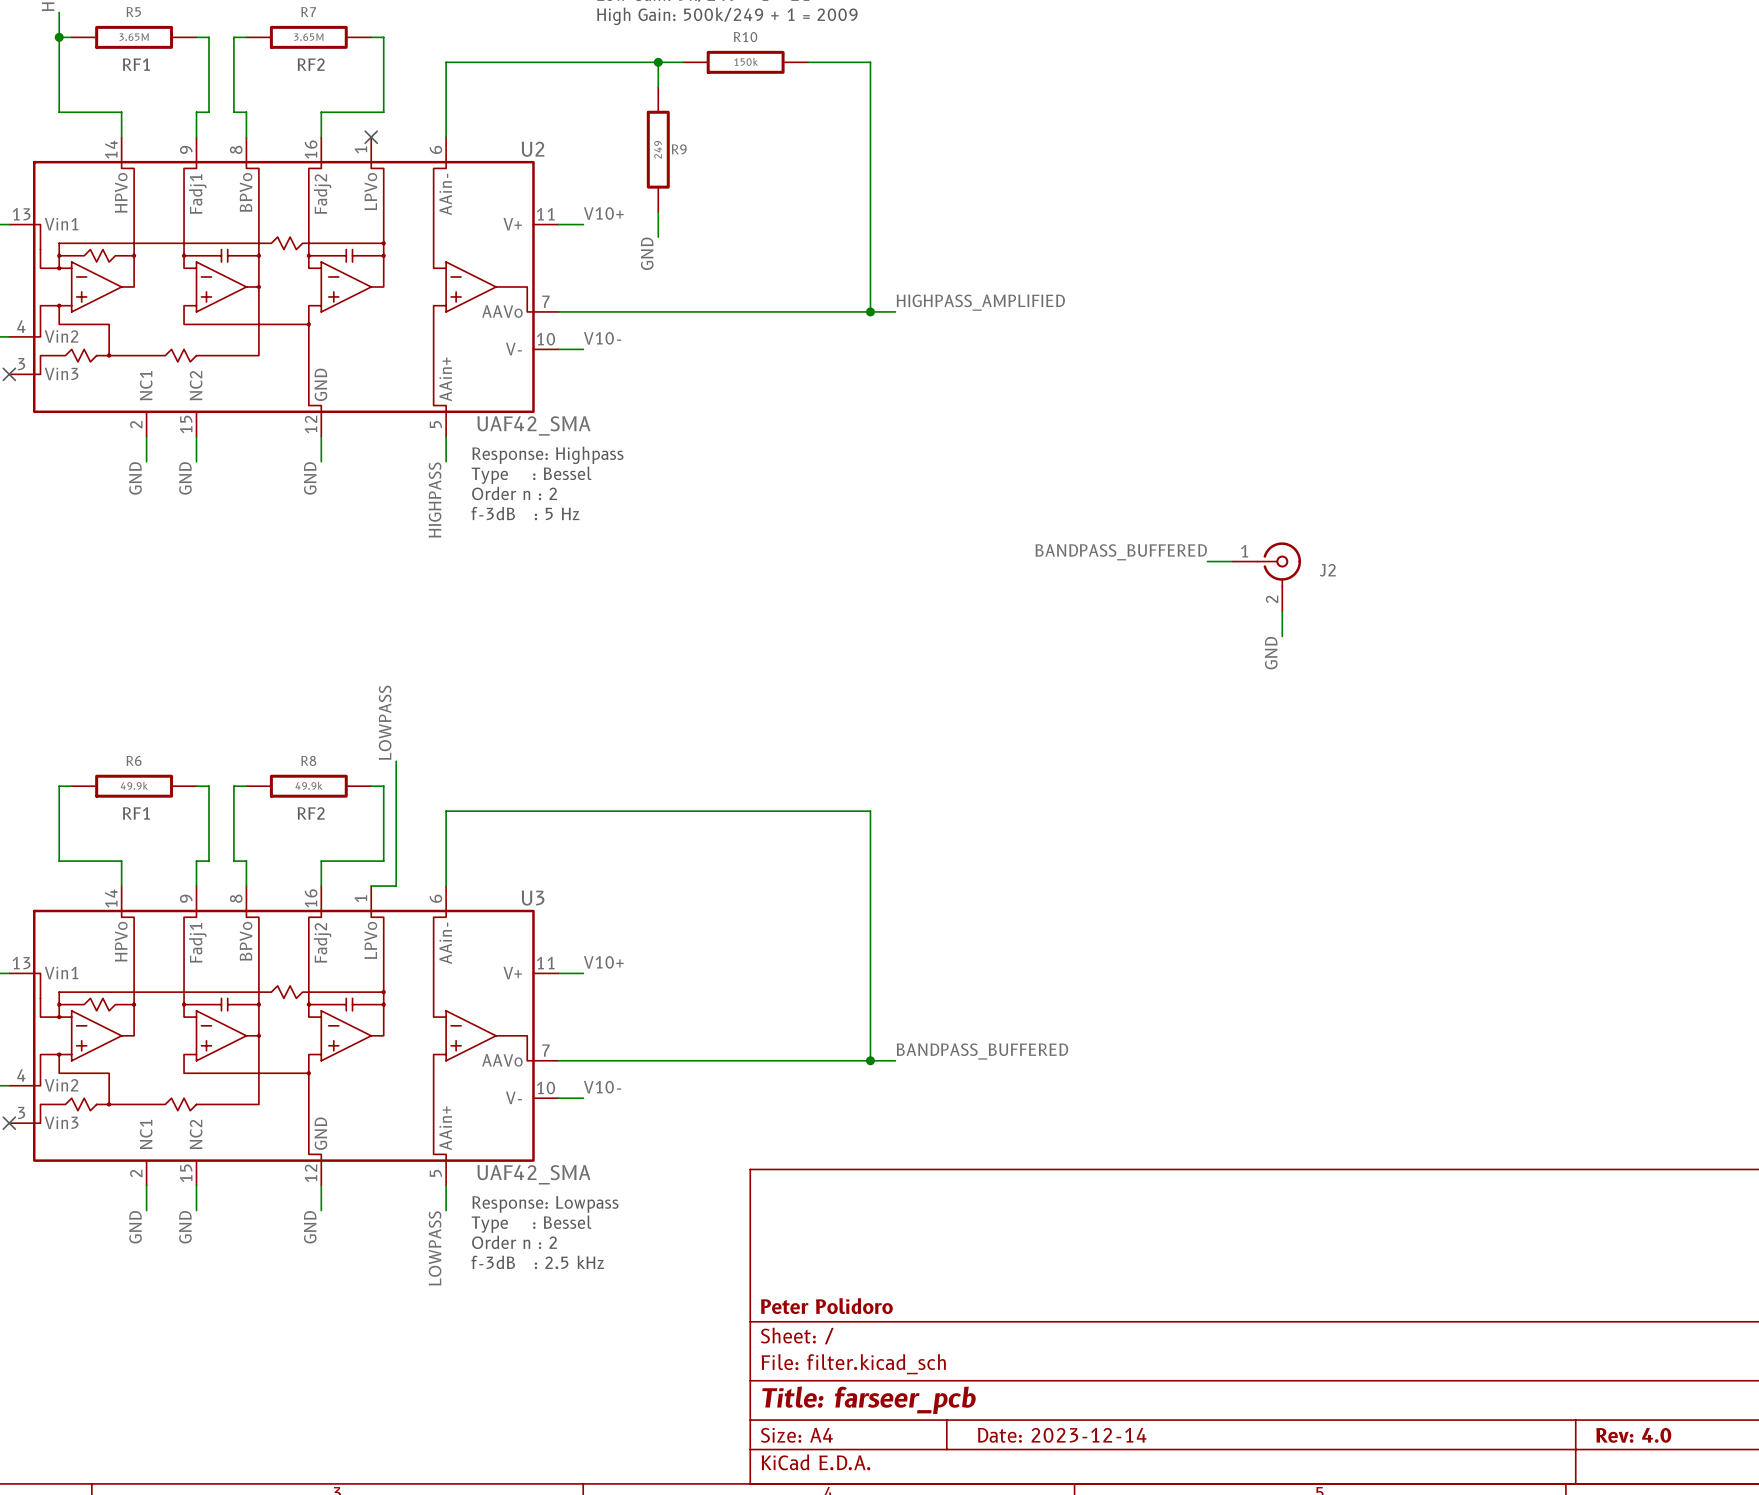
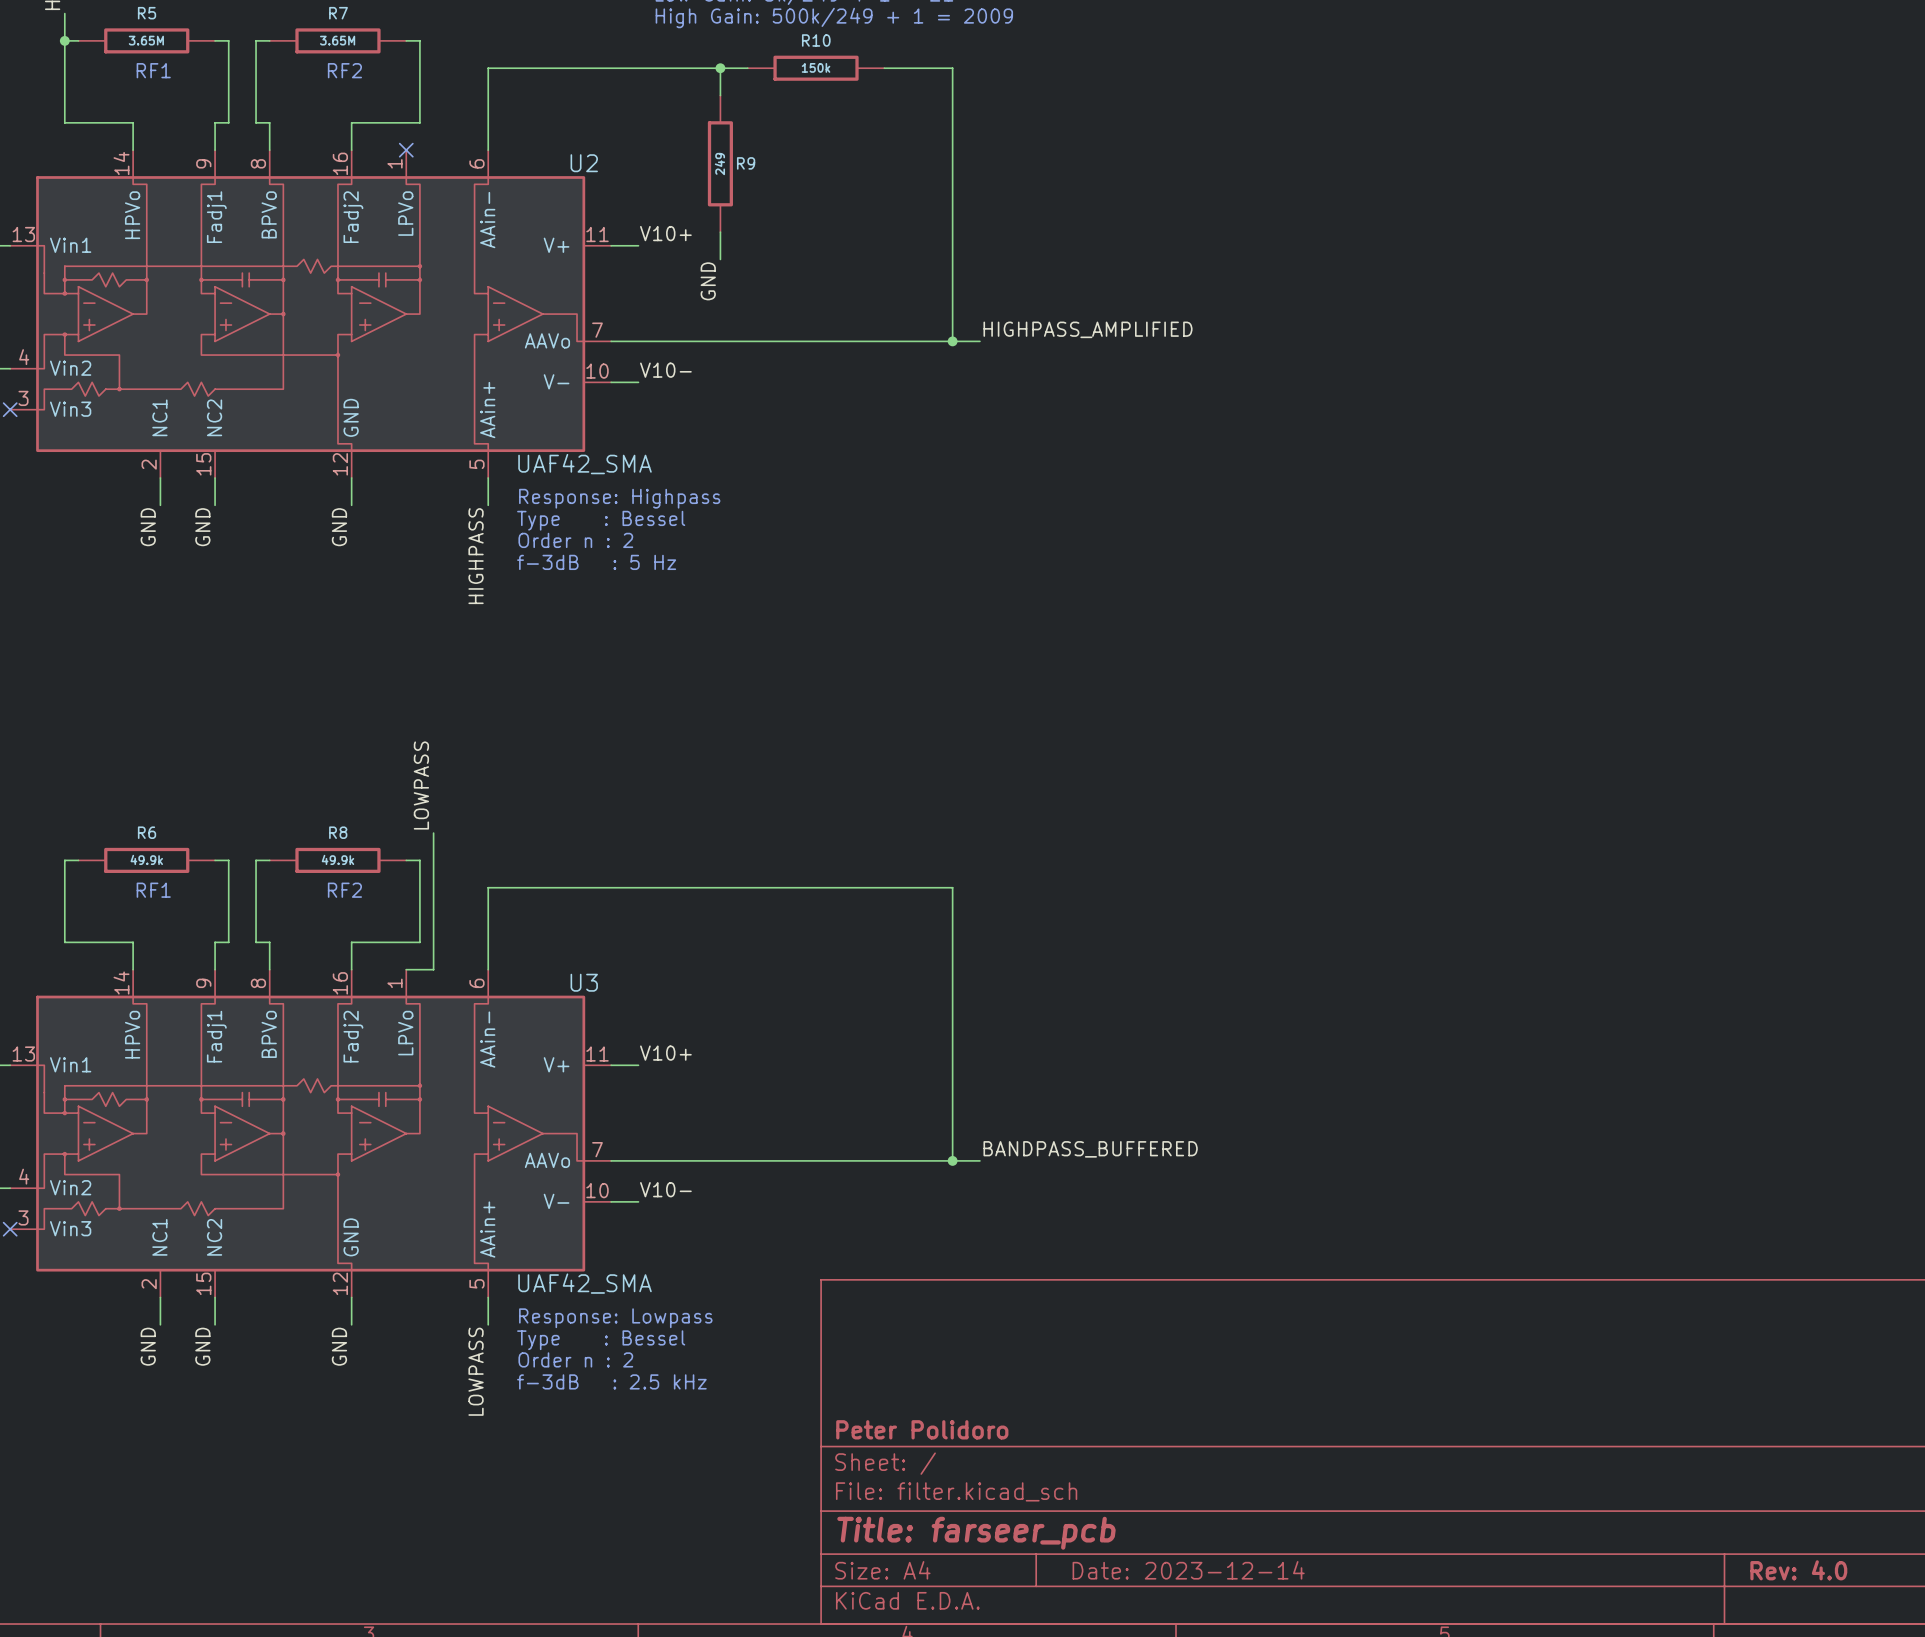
label: BANDPASS_BUFFERED (1121, 552) -> none
wire: (1207, 561) (1232, 561) -> none
J2: (1266, 576) -> none
wire: (1282, 611) (1282, 636) -> none
label: GND (1271, 653) -> none

